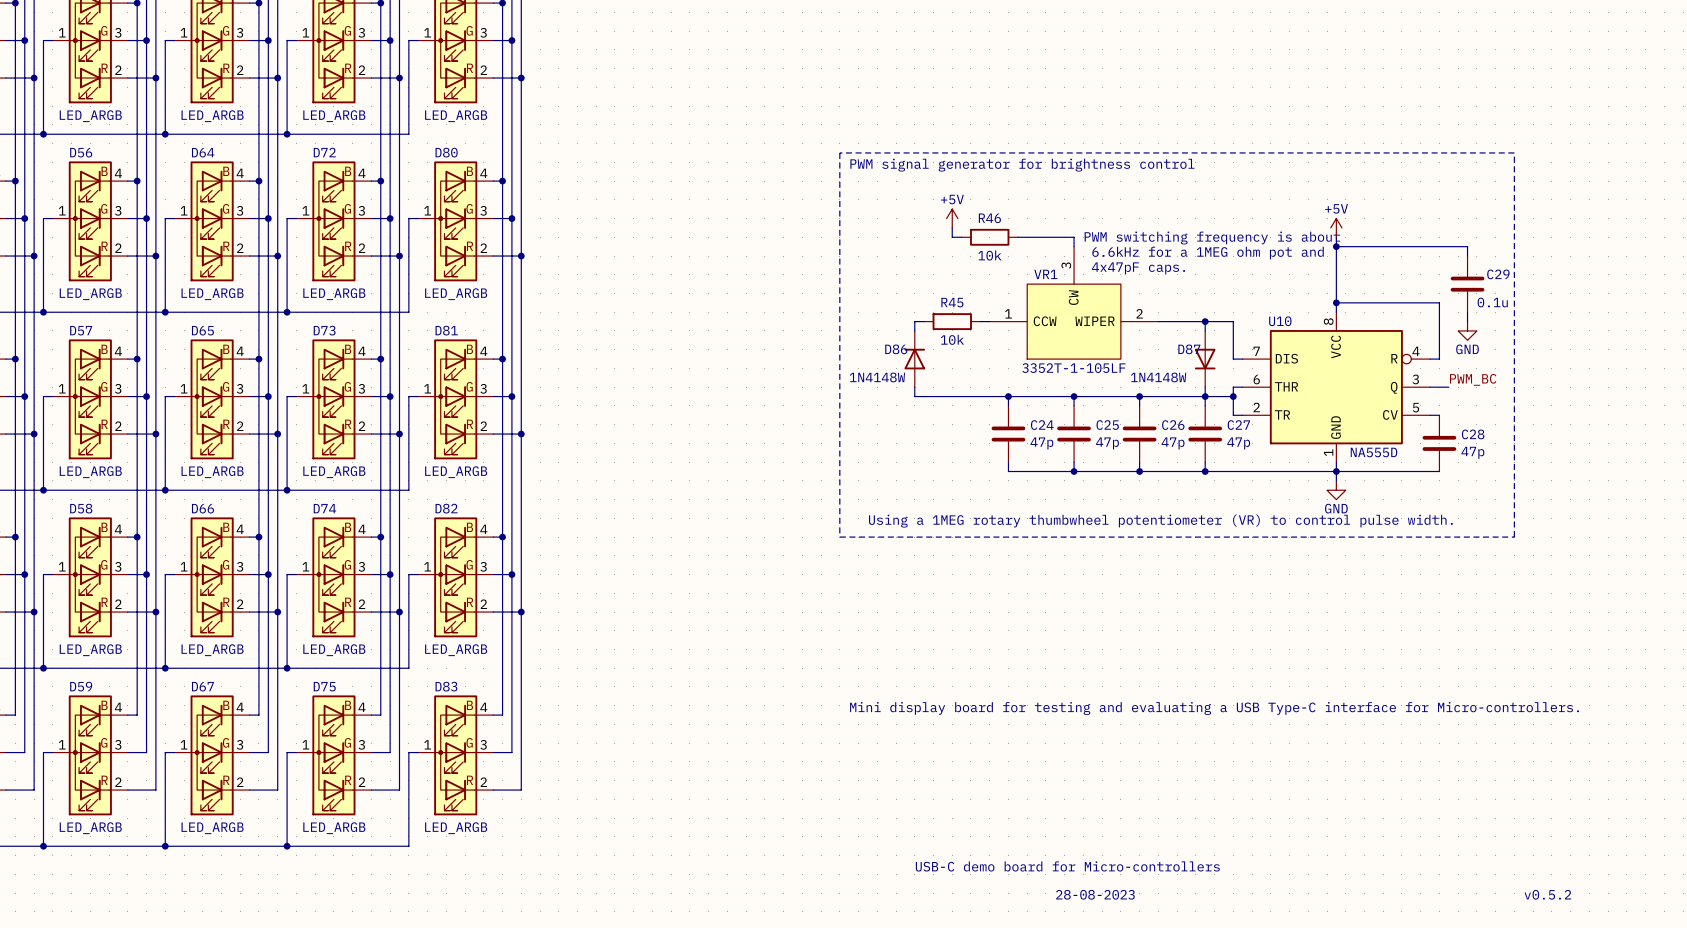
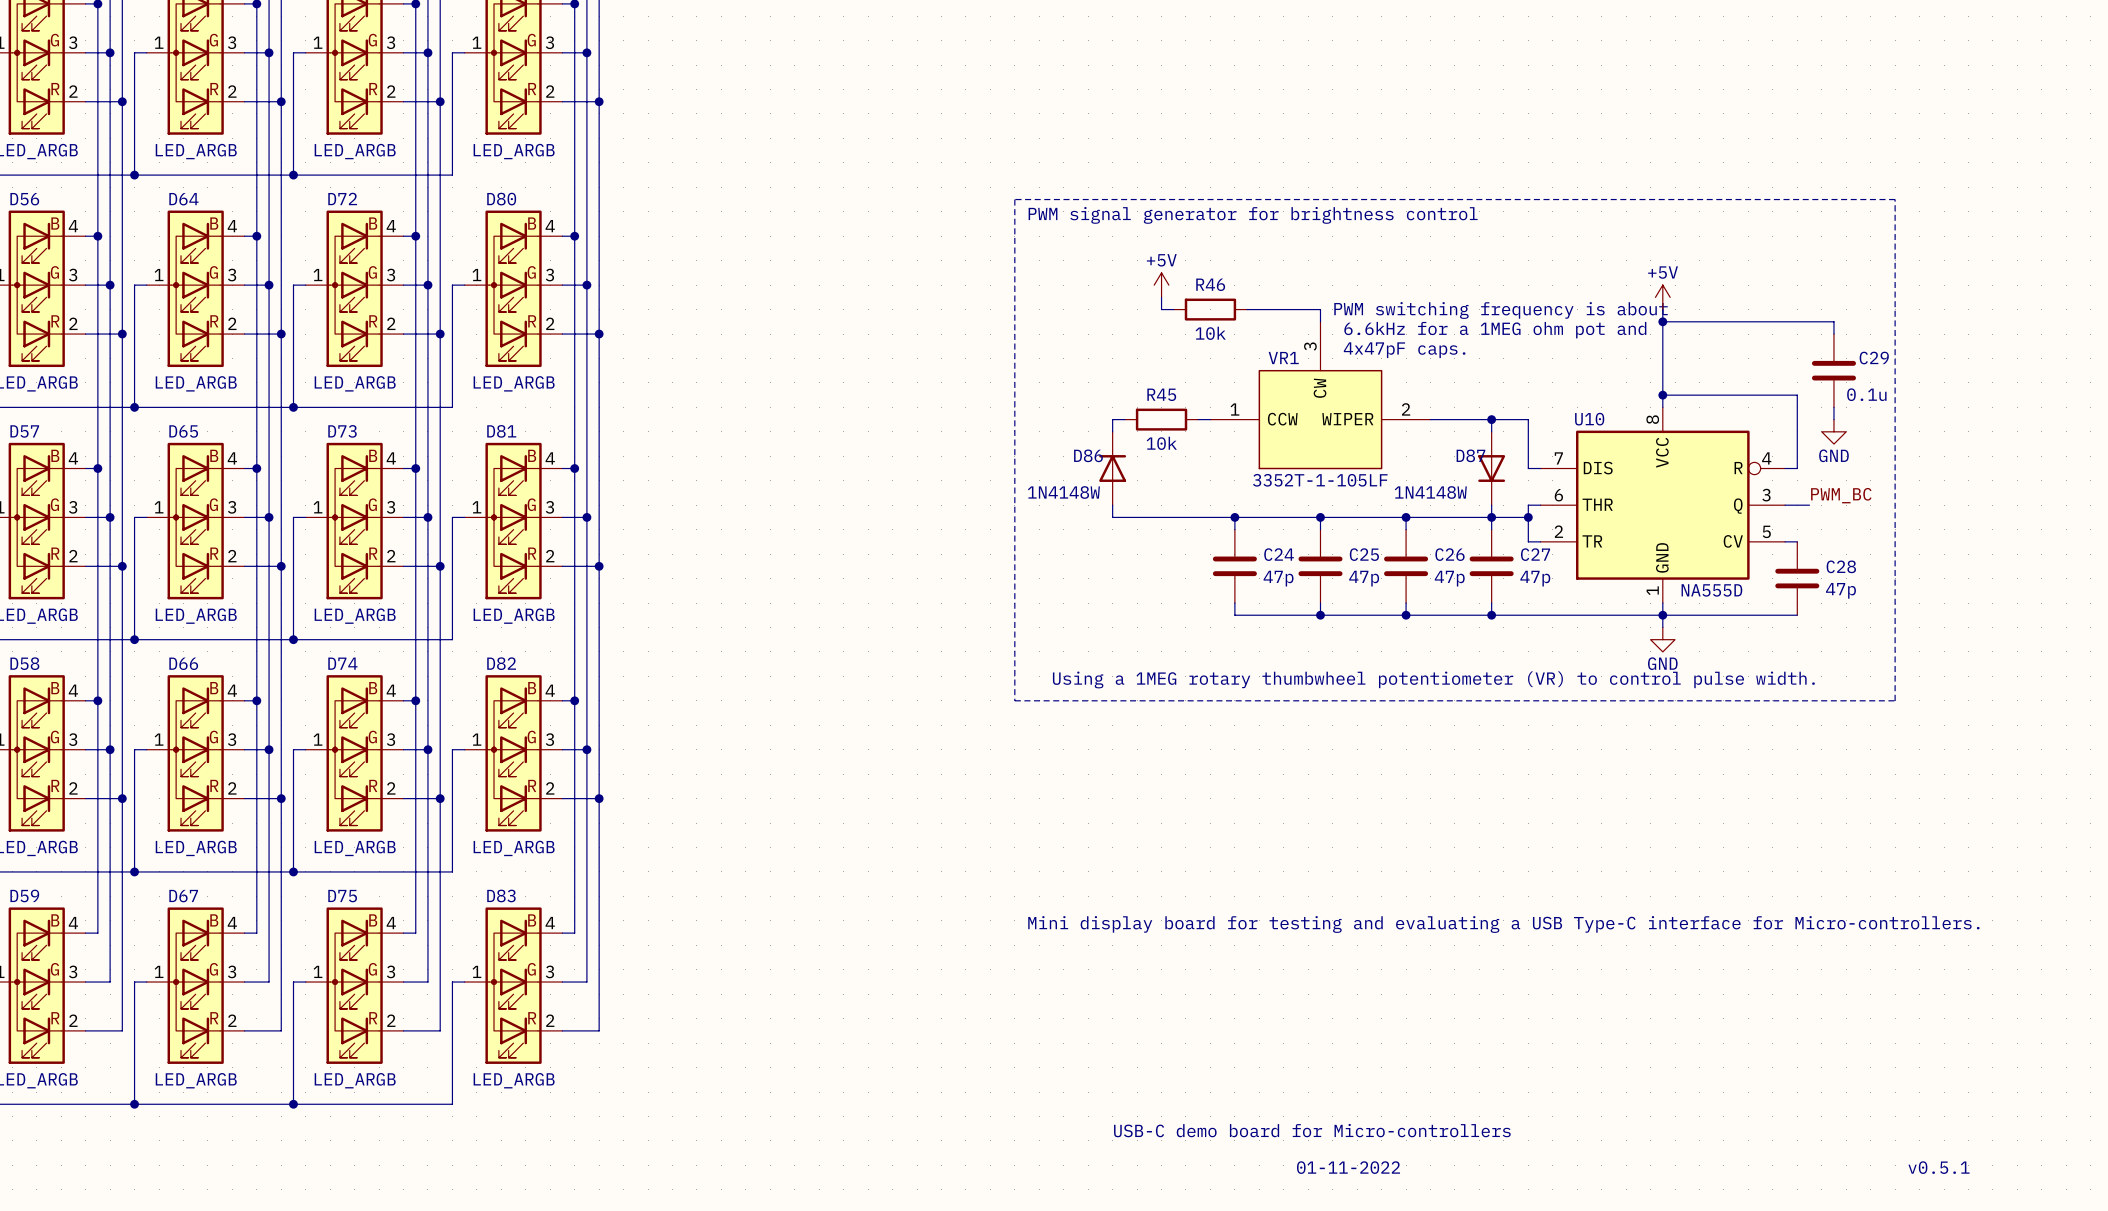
text: 28-08-2023 (1095, 894) -> 01-11-2022 (1348, 1167)
text: v0.5.2 (1547, 894) -> v0.5.1 (1939, 1167)

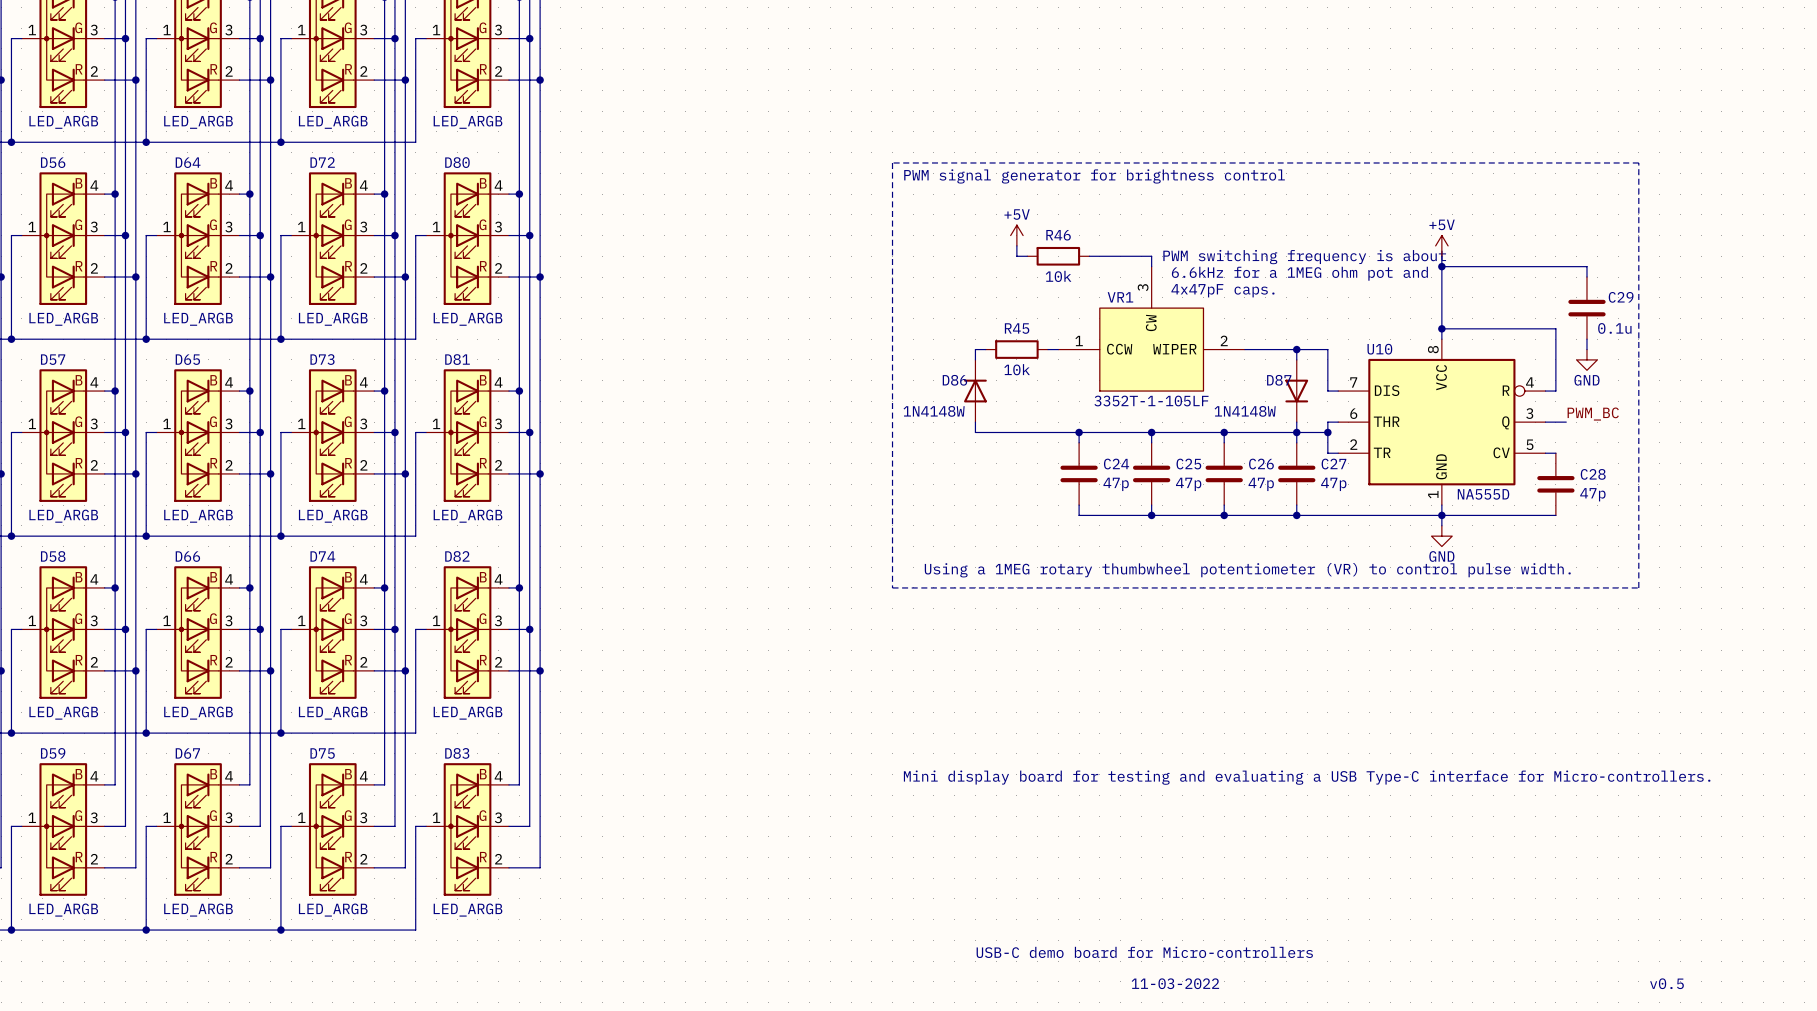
text: 01-11-2022 (1348, 1167) -> 11-03-2022 (1175, 983)
text: v0.5.1 (1939, 1167) -> v0.5 (1666, 983)

